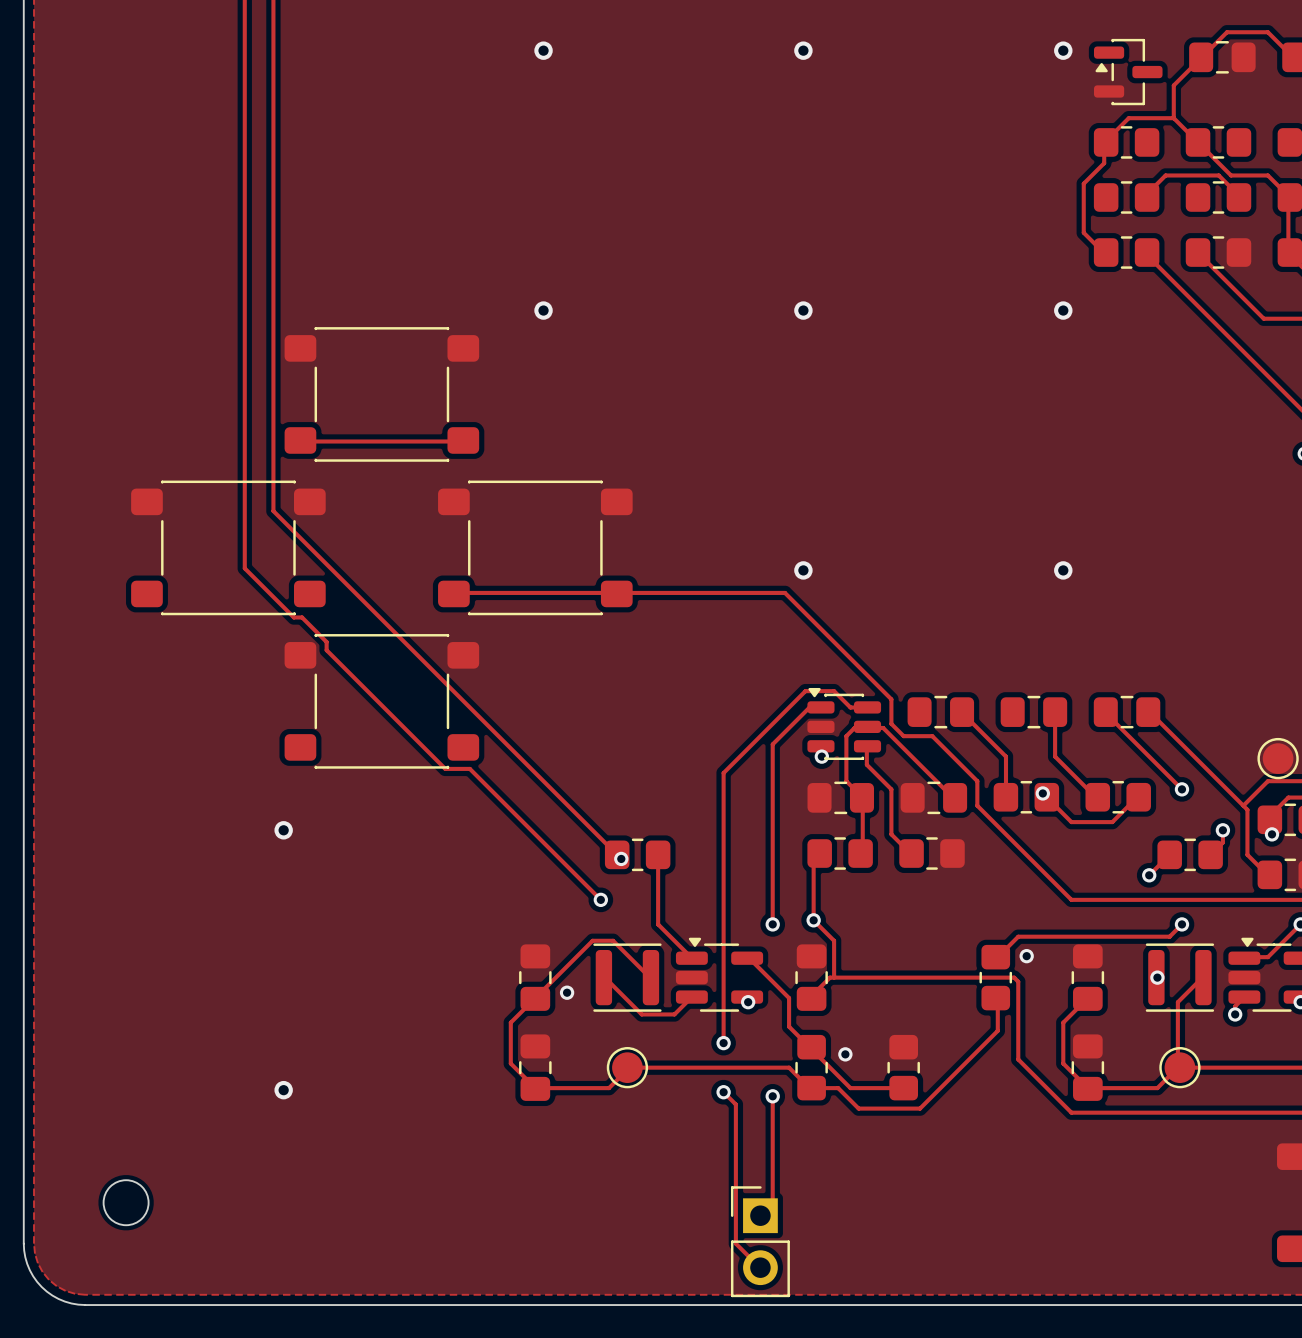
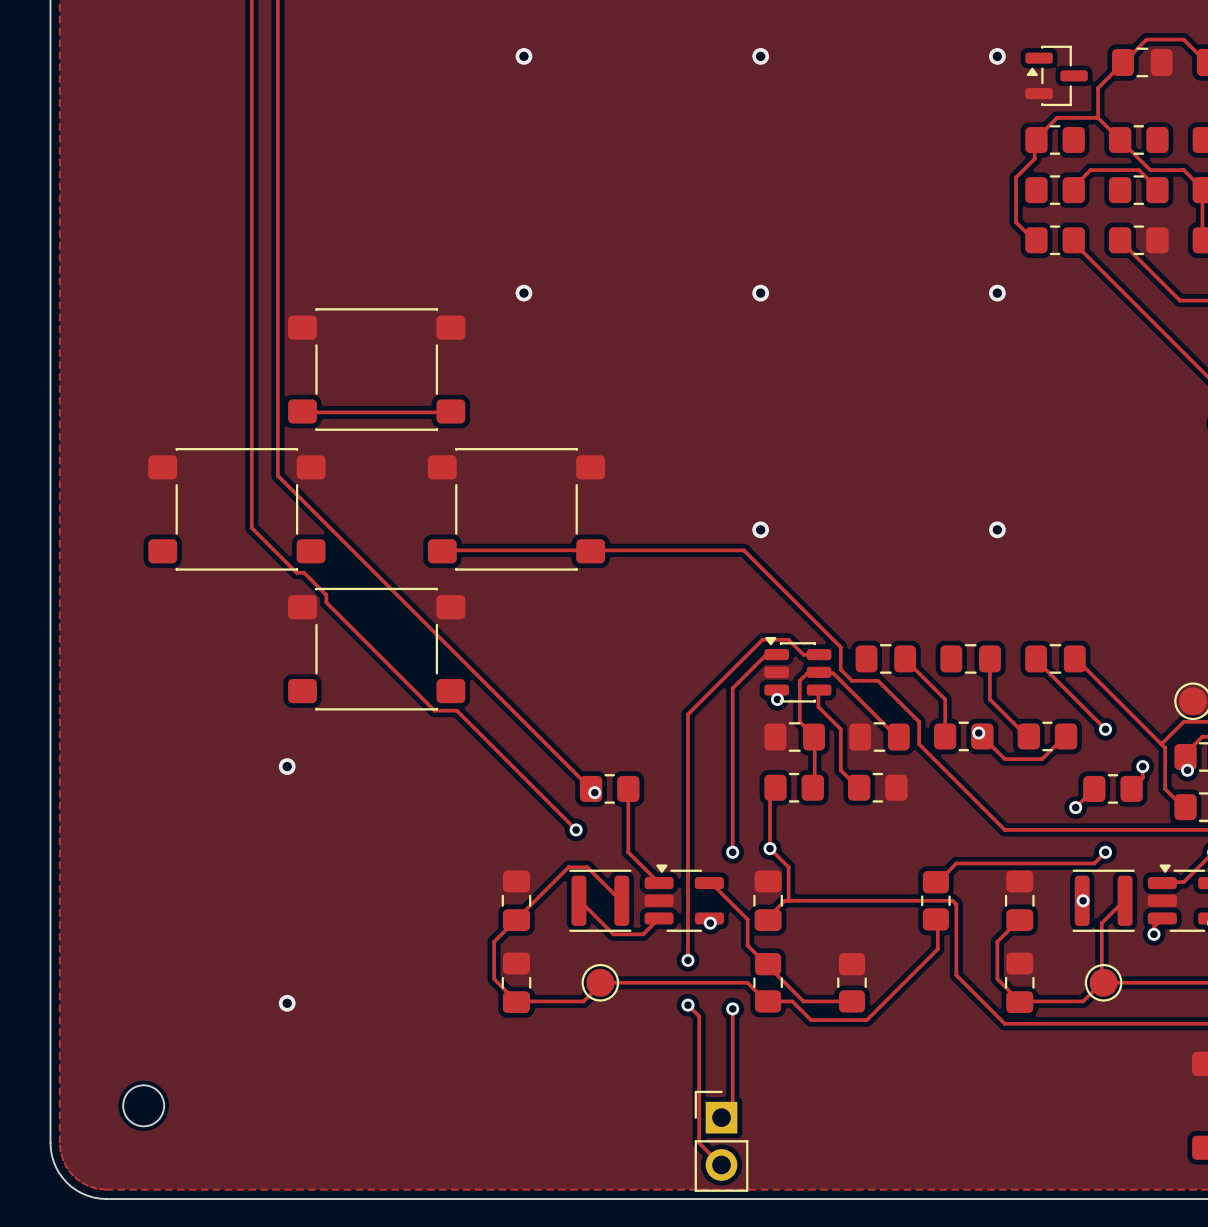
via: (1026, 956) -> none
via: (567, 992) -> none
via: (845, 1054) -> none

